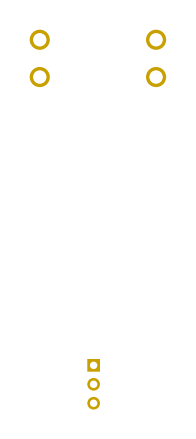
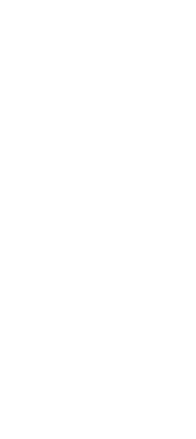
part: (39, 58) -> none
part: (156, 58) -> none
part: (93, 384) -> none

